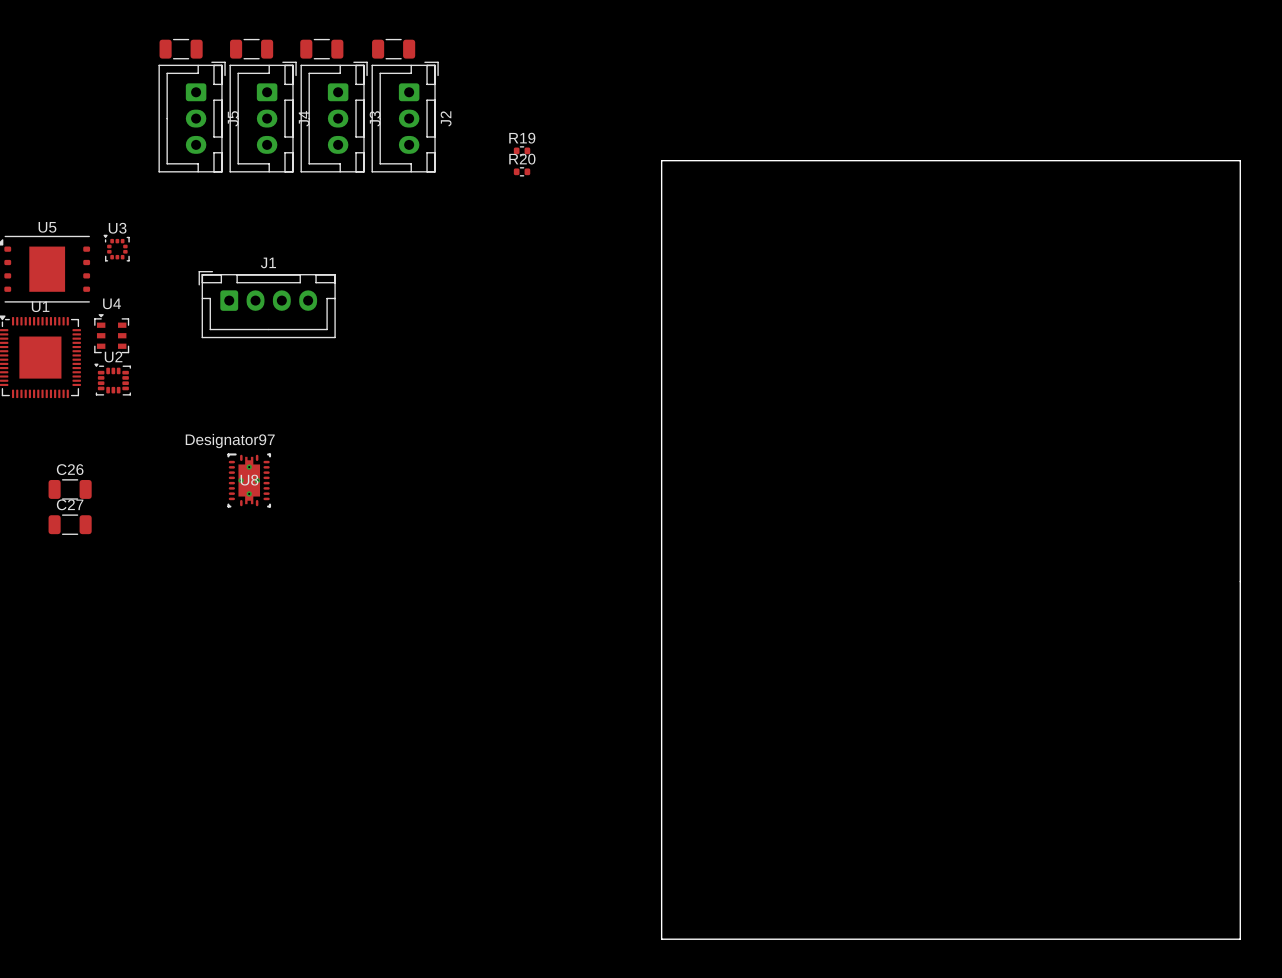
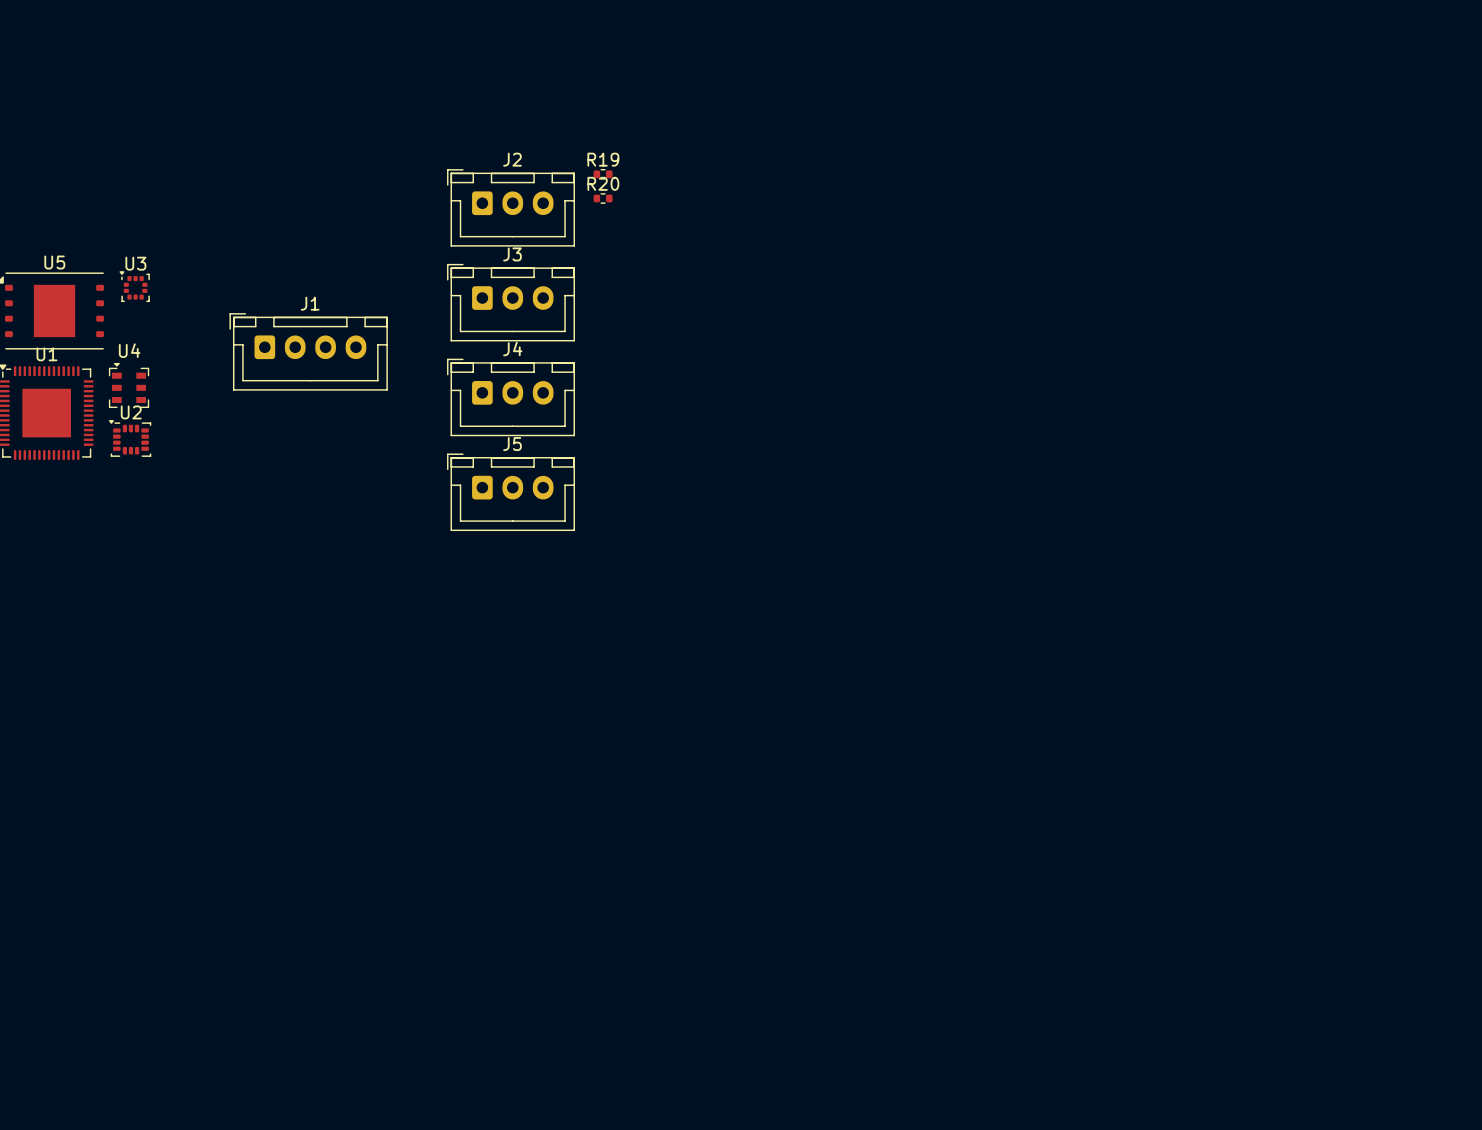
part: (181, 49) -> none
part: (251, 49) -> none
part: (321, 49) -> none
part: (393, 49) -> none
J5 rotation: 0° (192, 117) -> 90° counterclockwise (511, 492)
J5 position: (192, 117) -> (511, 492)
J4 rotation: 0° (263, 117) -> 90° counterclockwise (511, 397)
J4 position: (263, 117) -> (511, 397)
J3 rotation: 0° (334, 117) -> 90° counterclockwise (511, 302)
J3 position: (334, 117) -> (511, 302)
J2 rotation: 0° (405, 117) -> 90° counterclockwise (511, 207)
J2 position: (405, 117) -> (511, 207)
board edge: (661, 160) (661, 939) (1240, 939) (1240, 160) (661, 160) -> none
U8: (249, 480) -> none
C26: (70, 489) -> none
C27: (70, 524) -> none

